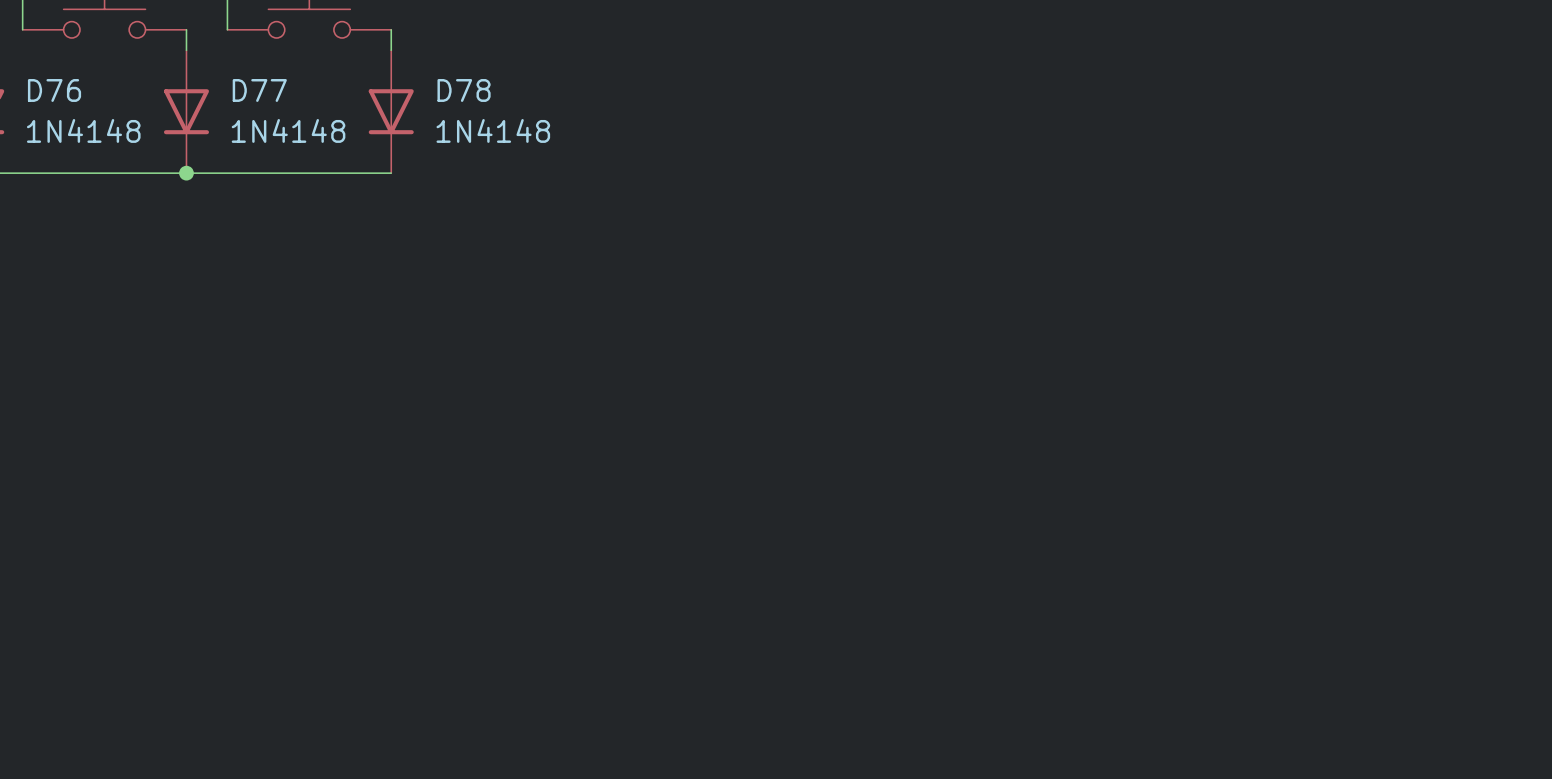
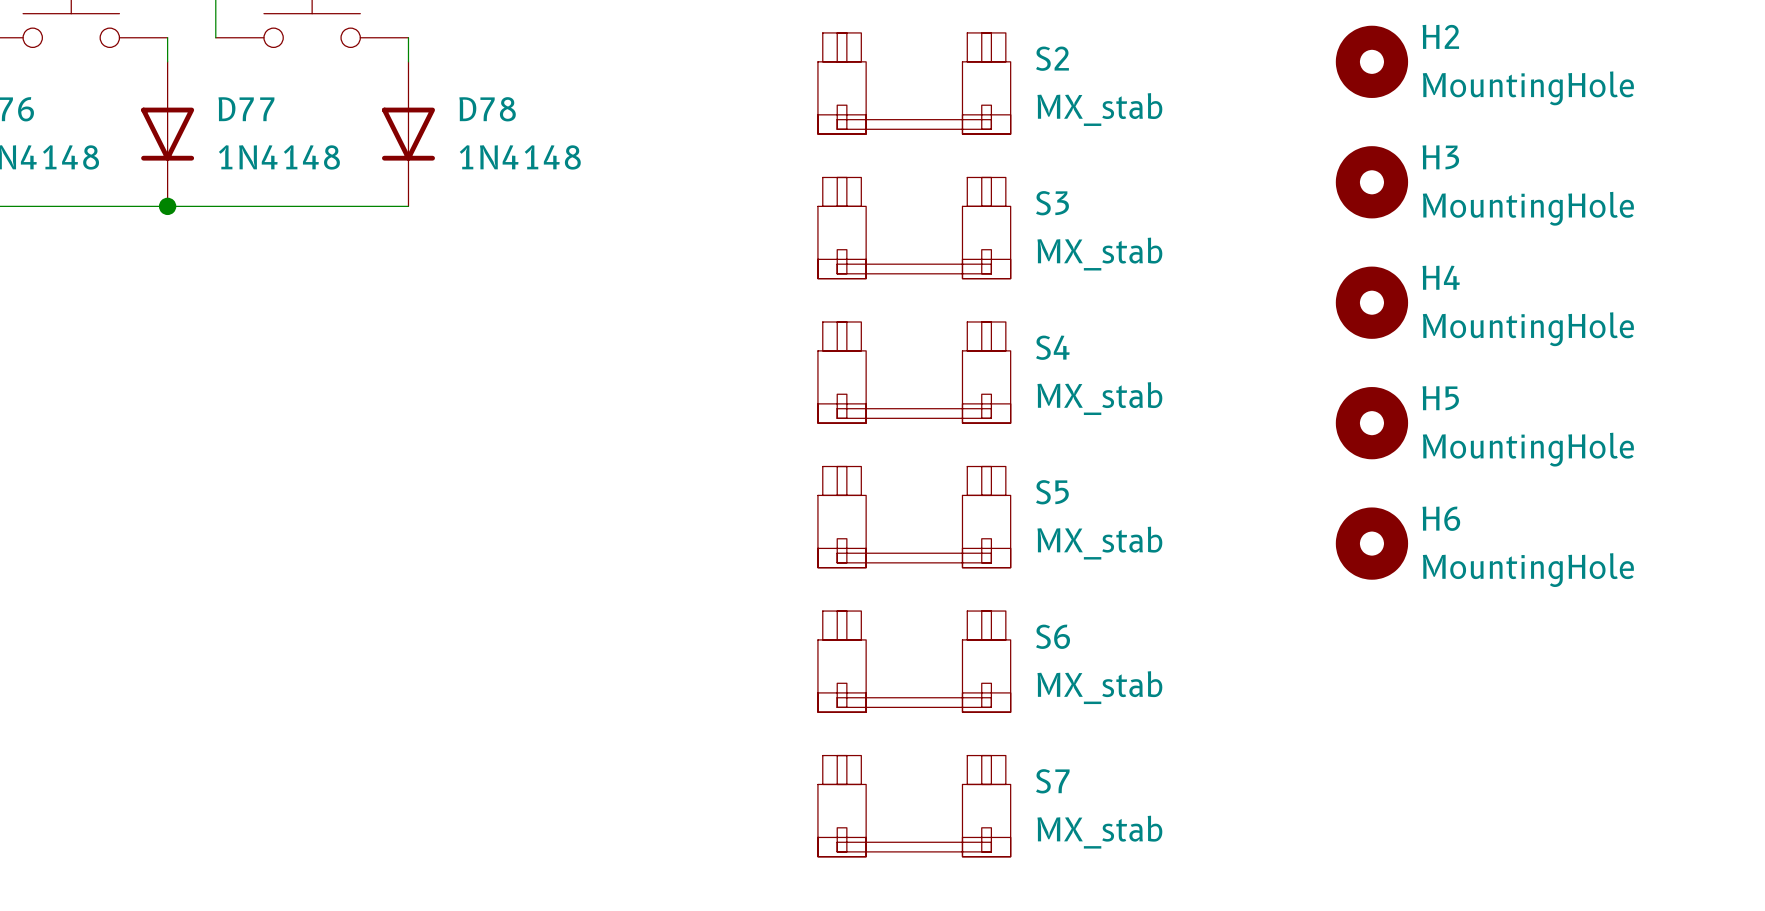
H2: none -> MountingHole (1371, 61)
S2: none -> MX_stab (914, 83)
H3: none -> MountingHole (1371, 182)
S3: none -> MX_stab (914, 228)
H4: none -> MountingHole (1371, 302)
S4: none -> MX_stab (914, 372)
H5: none -> MountingHole (1371, 423)
S5: none -> MX_stab (914, 517)
H6: none -> MountingHole (1371, 543)
S6: none -> MX_stab (914, 661)
S7: none -> MX_stab (914, 806)

